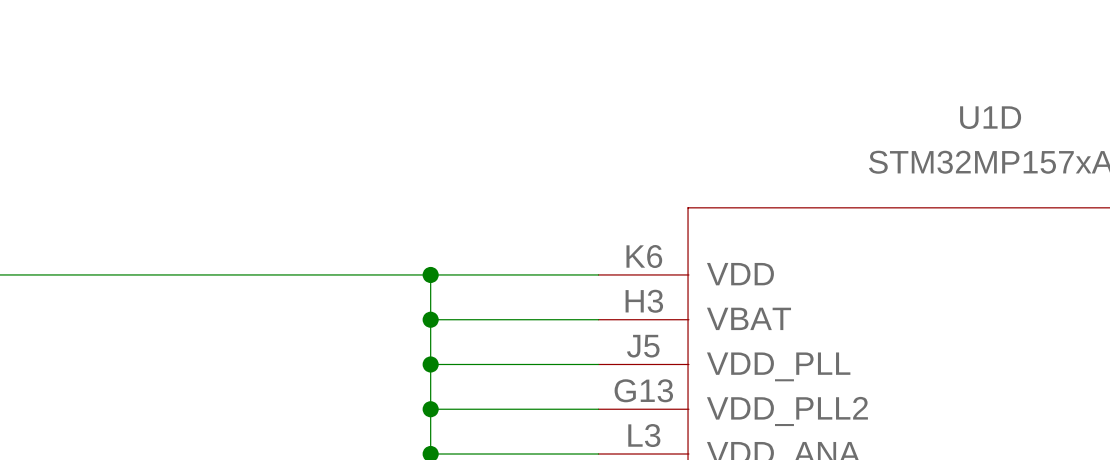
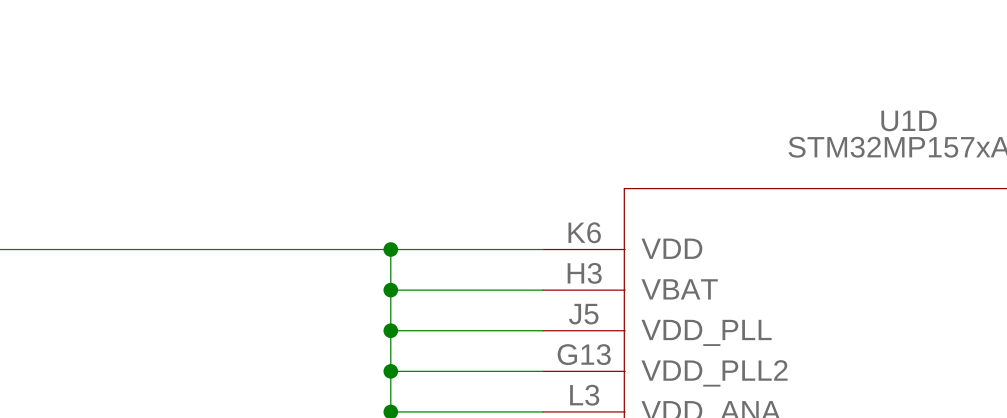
U1D name position: U1D (990, 117) -> U1D (909, 120)

